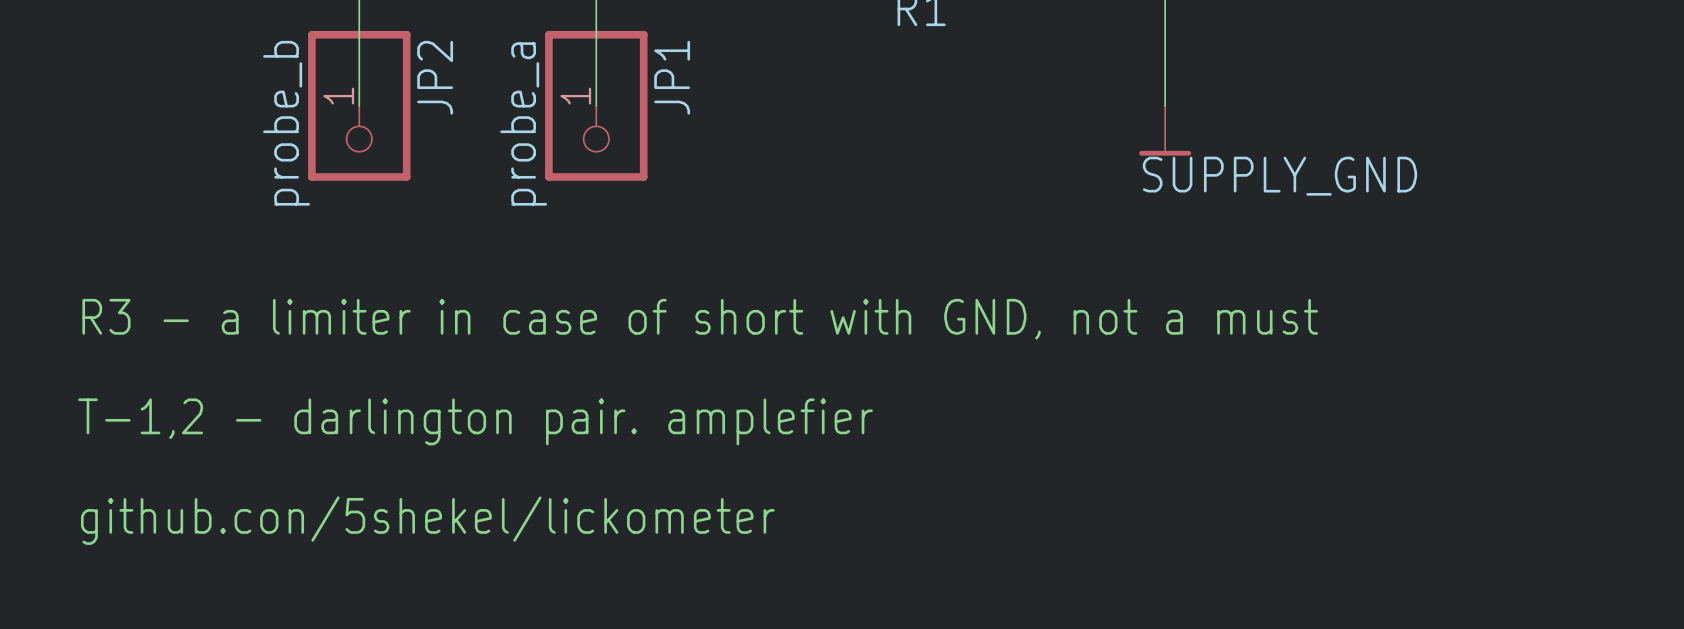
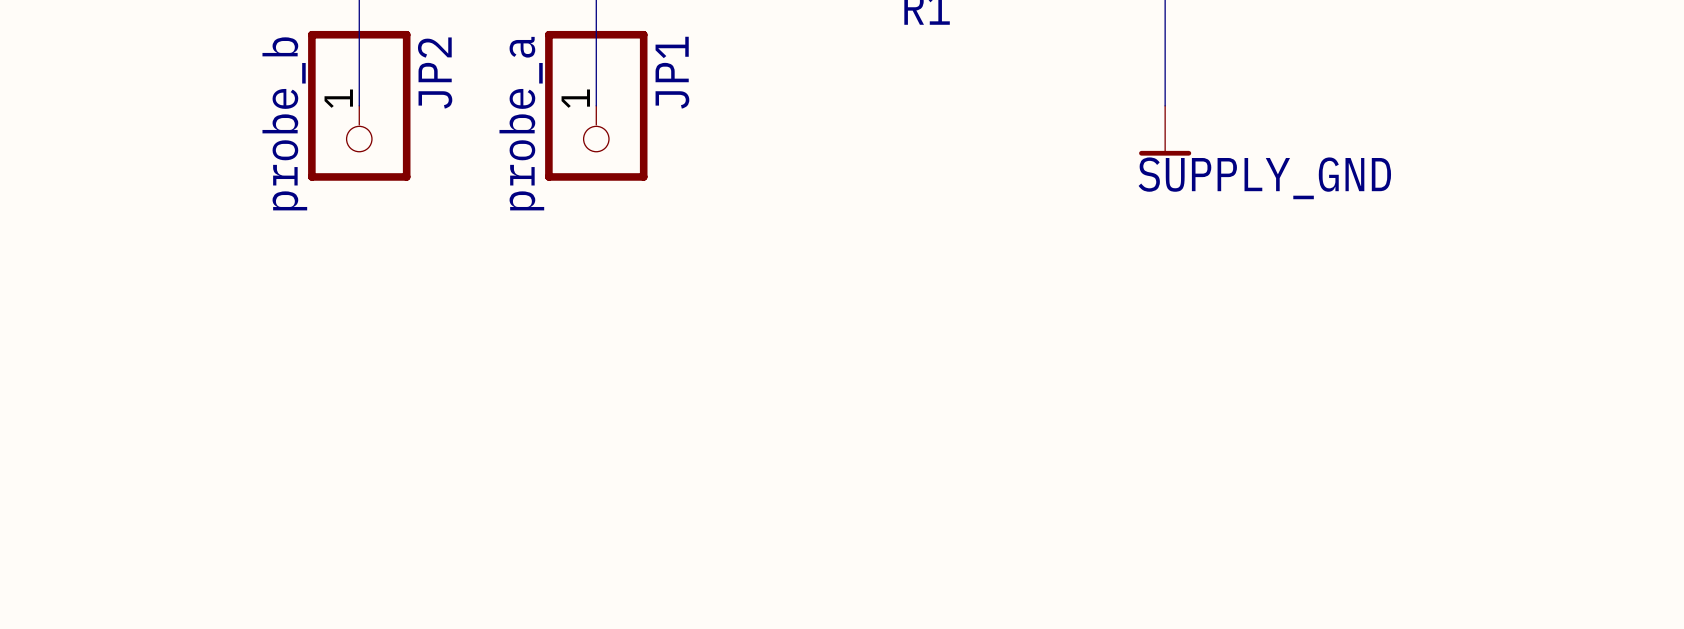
text: R3 - a limiter in case of short with GND, not a must (700, 319) -> none
text: T-1,2 - darlington pair. amplefier (475, 421) -> none
text: github.con/5shekel/lickometer (427, 520) -> none

